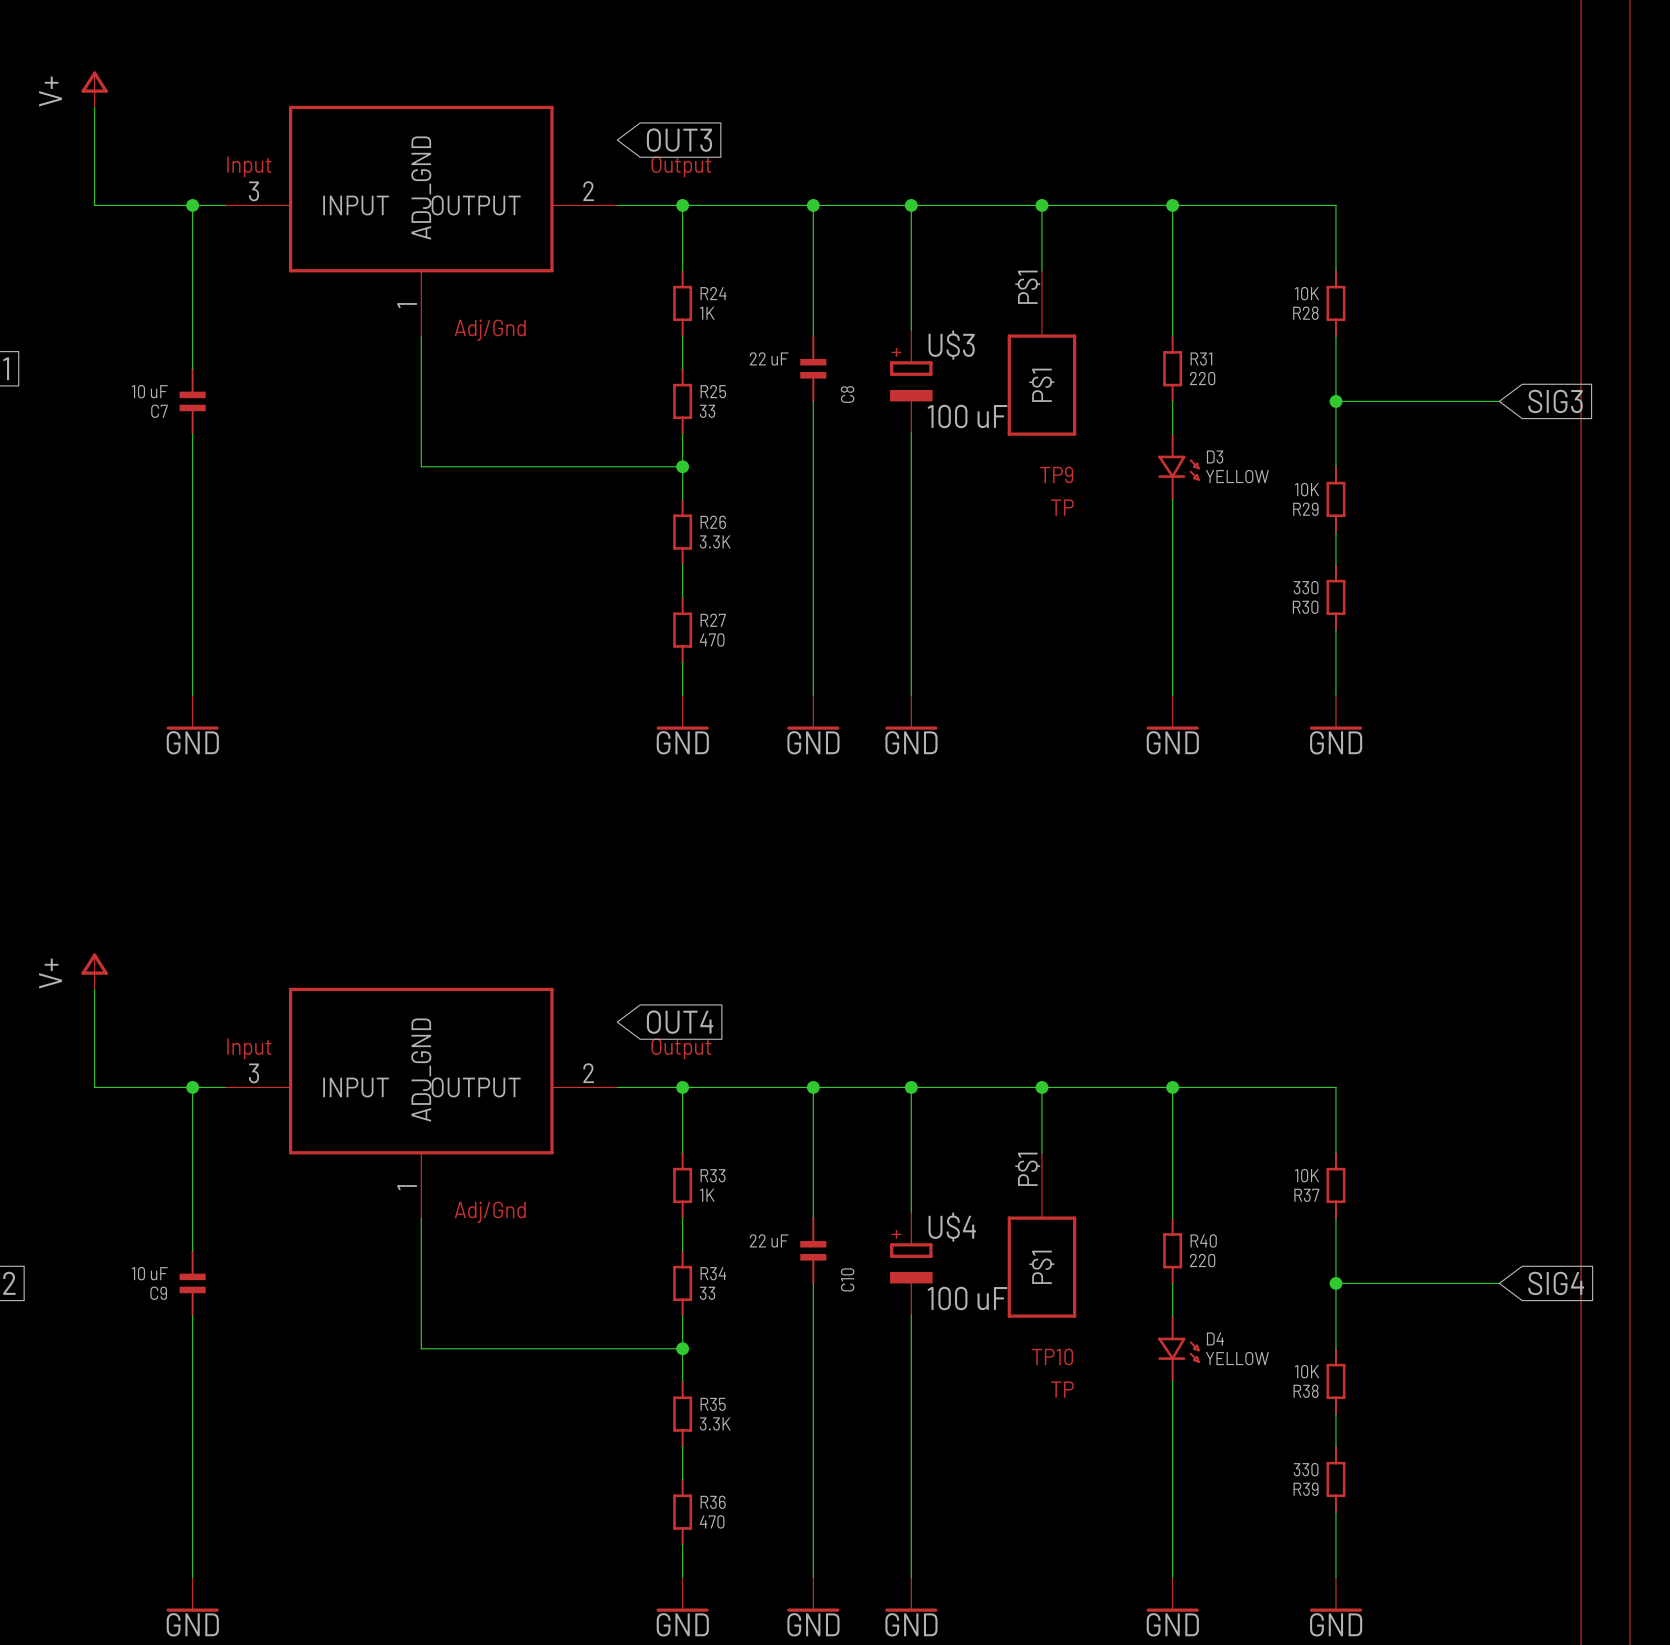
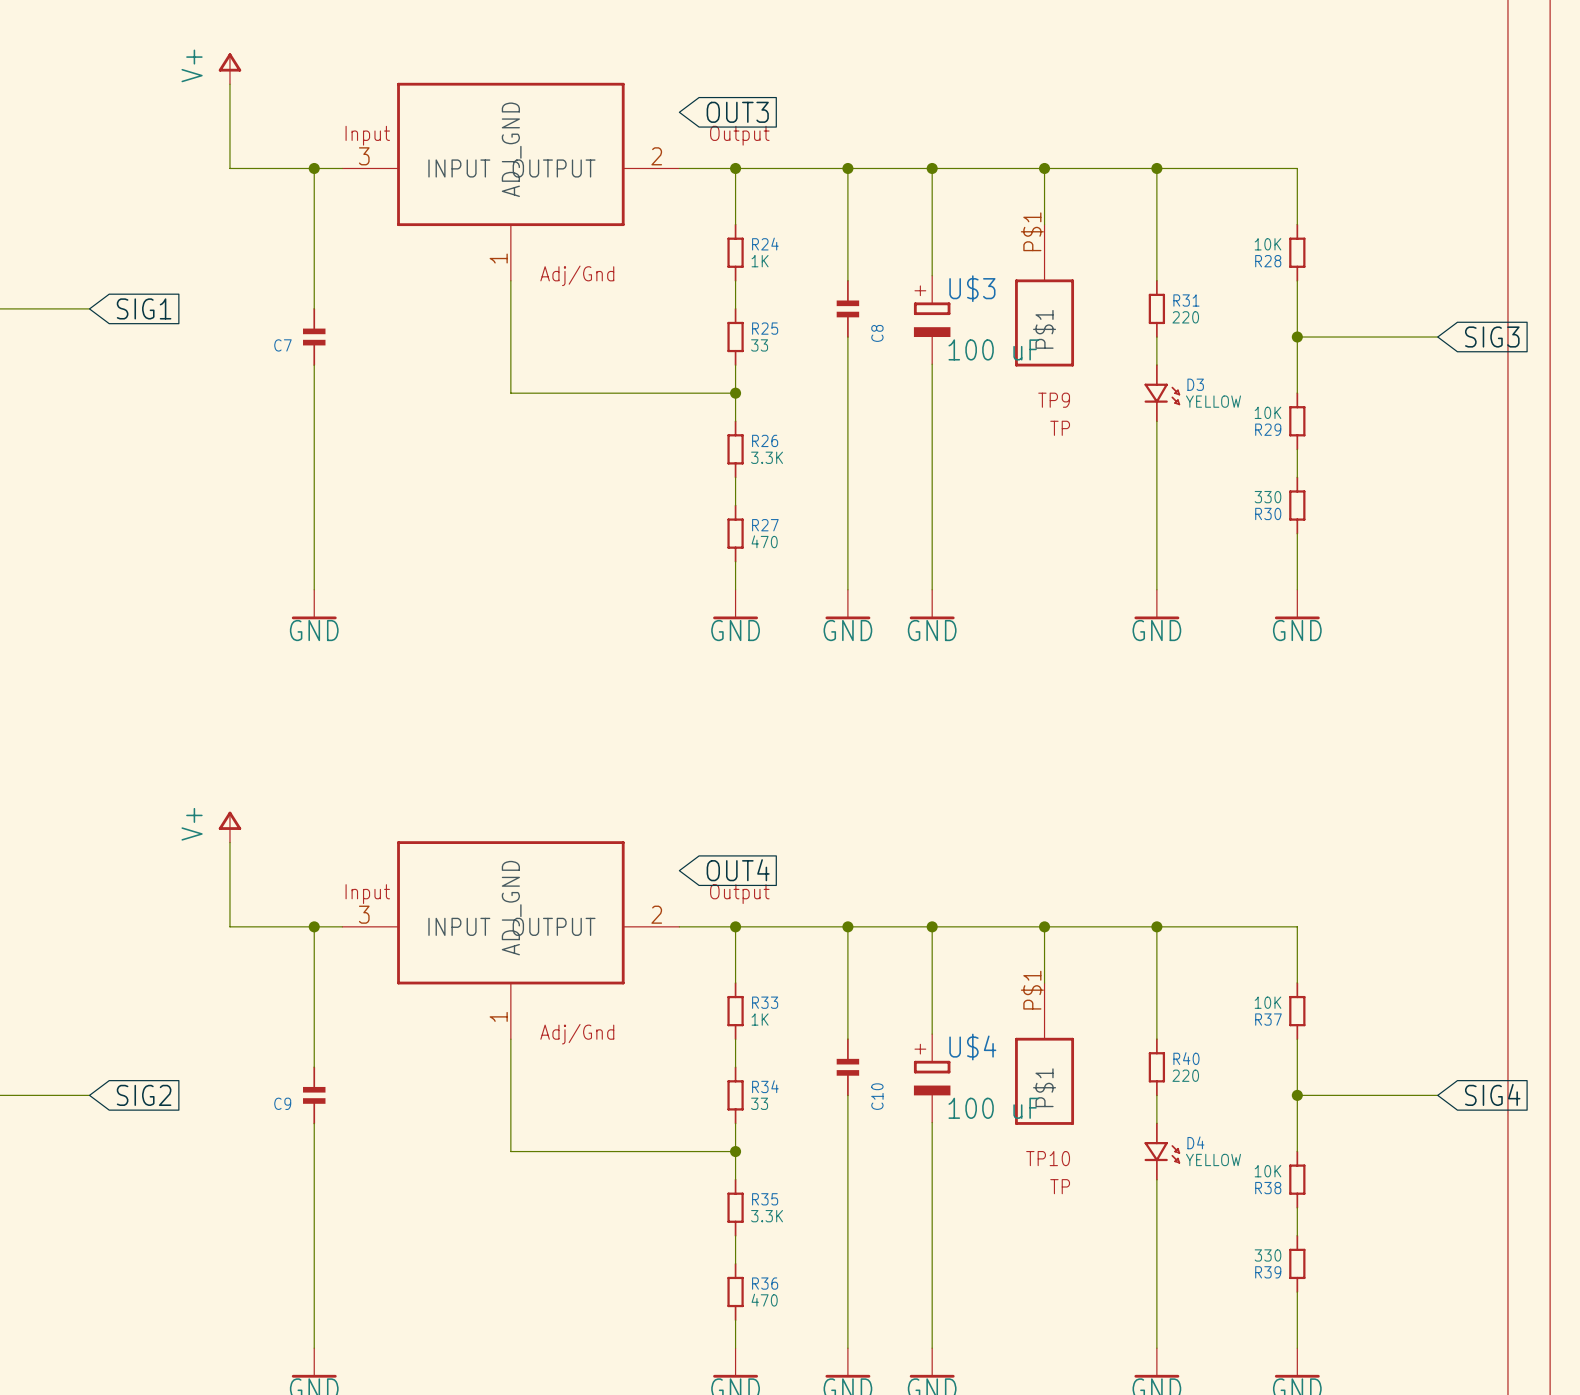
C8 value: 22 uF (769, 358) -> none
C7 value: 10 uF (149, 391) -> none
C10 value: 22 uF (769, 1240) -> none
C9 value: 10 uF (149, 1273) -> none

